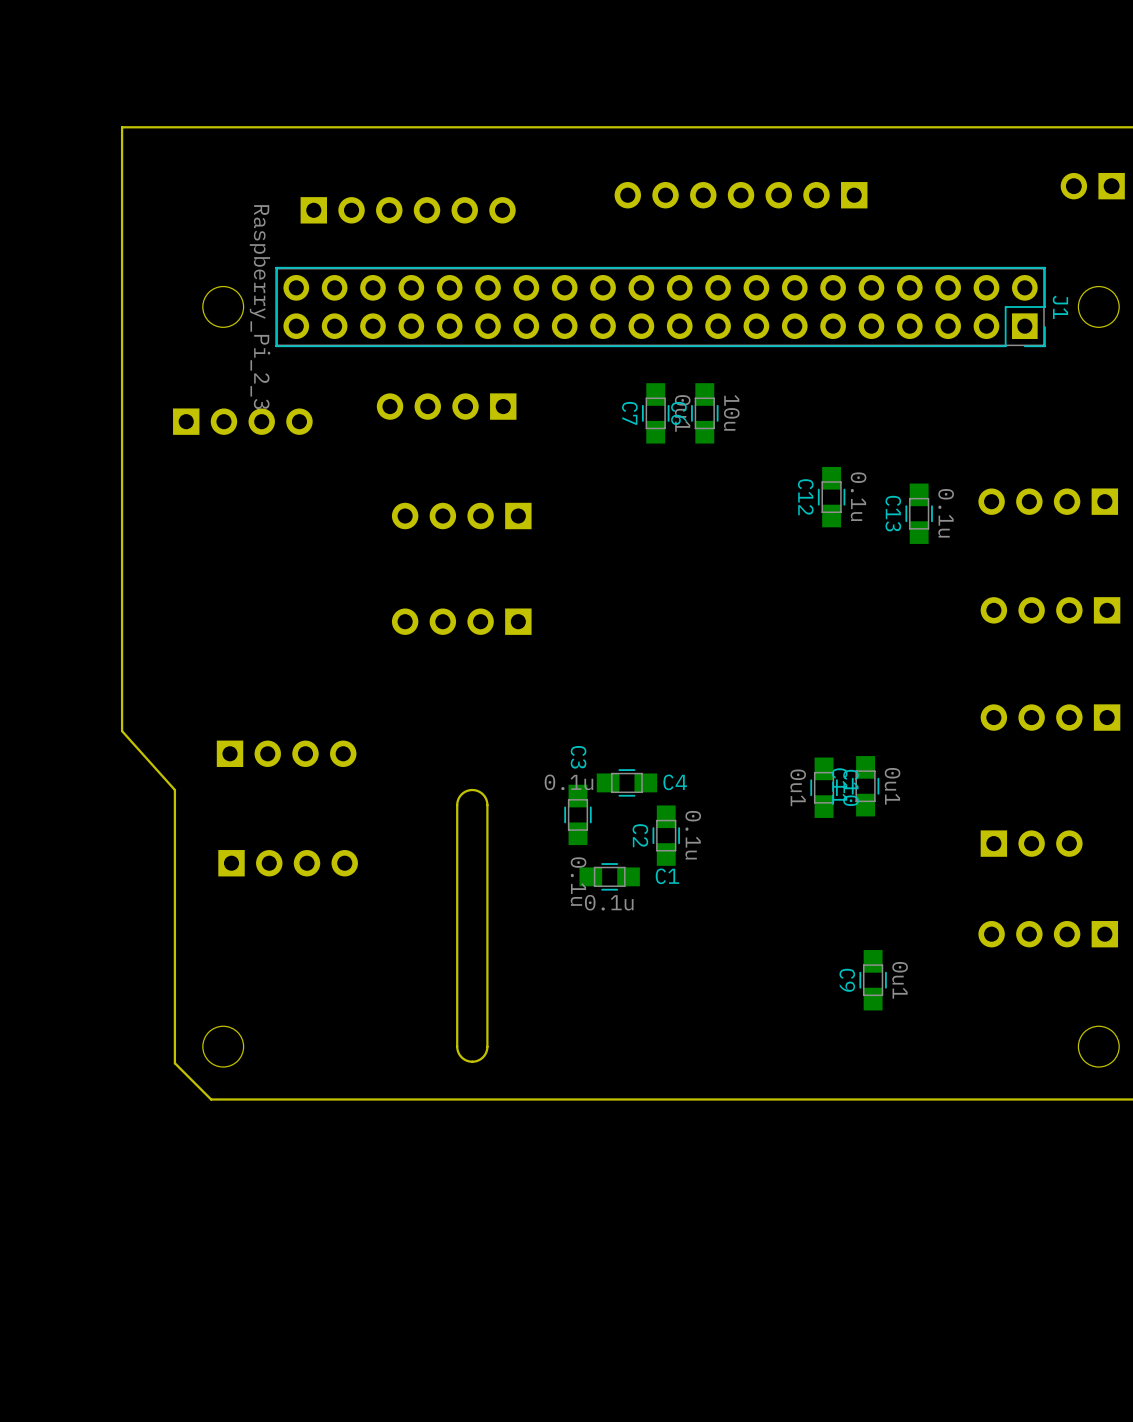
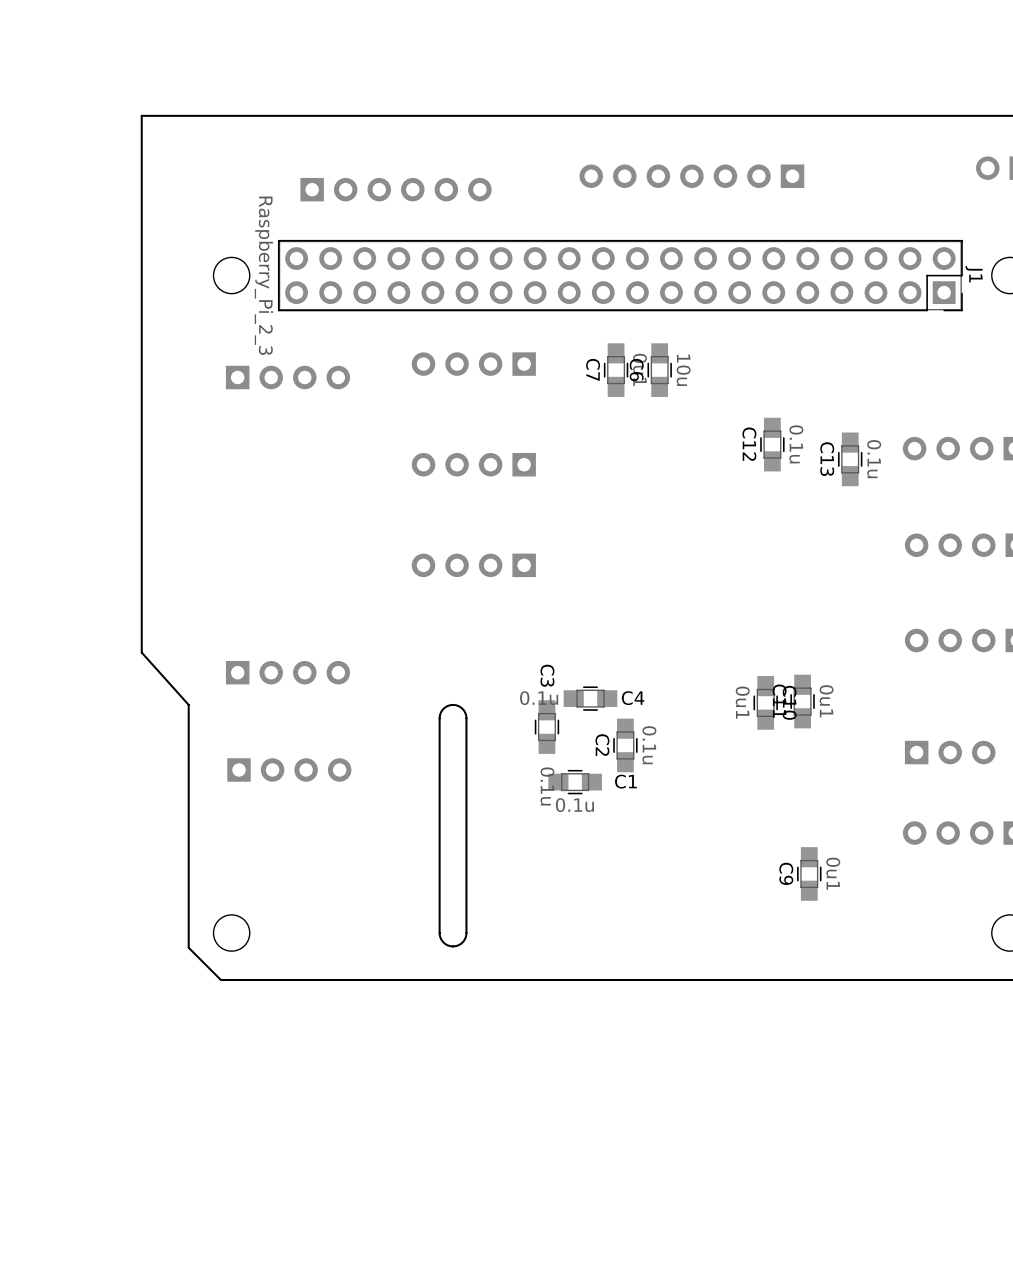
part position: (446, 406) -> (473, 364)
part position: (242, 421) -> (288, 377)
part position: (461, 516) -> (473, 464)
part position: (461, 621) -> (473, 565)

